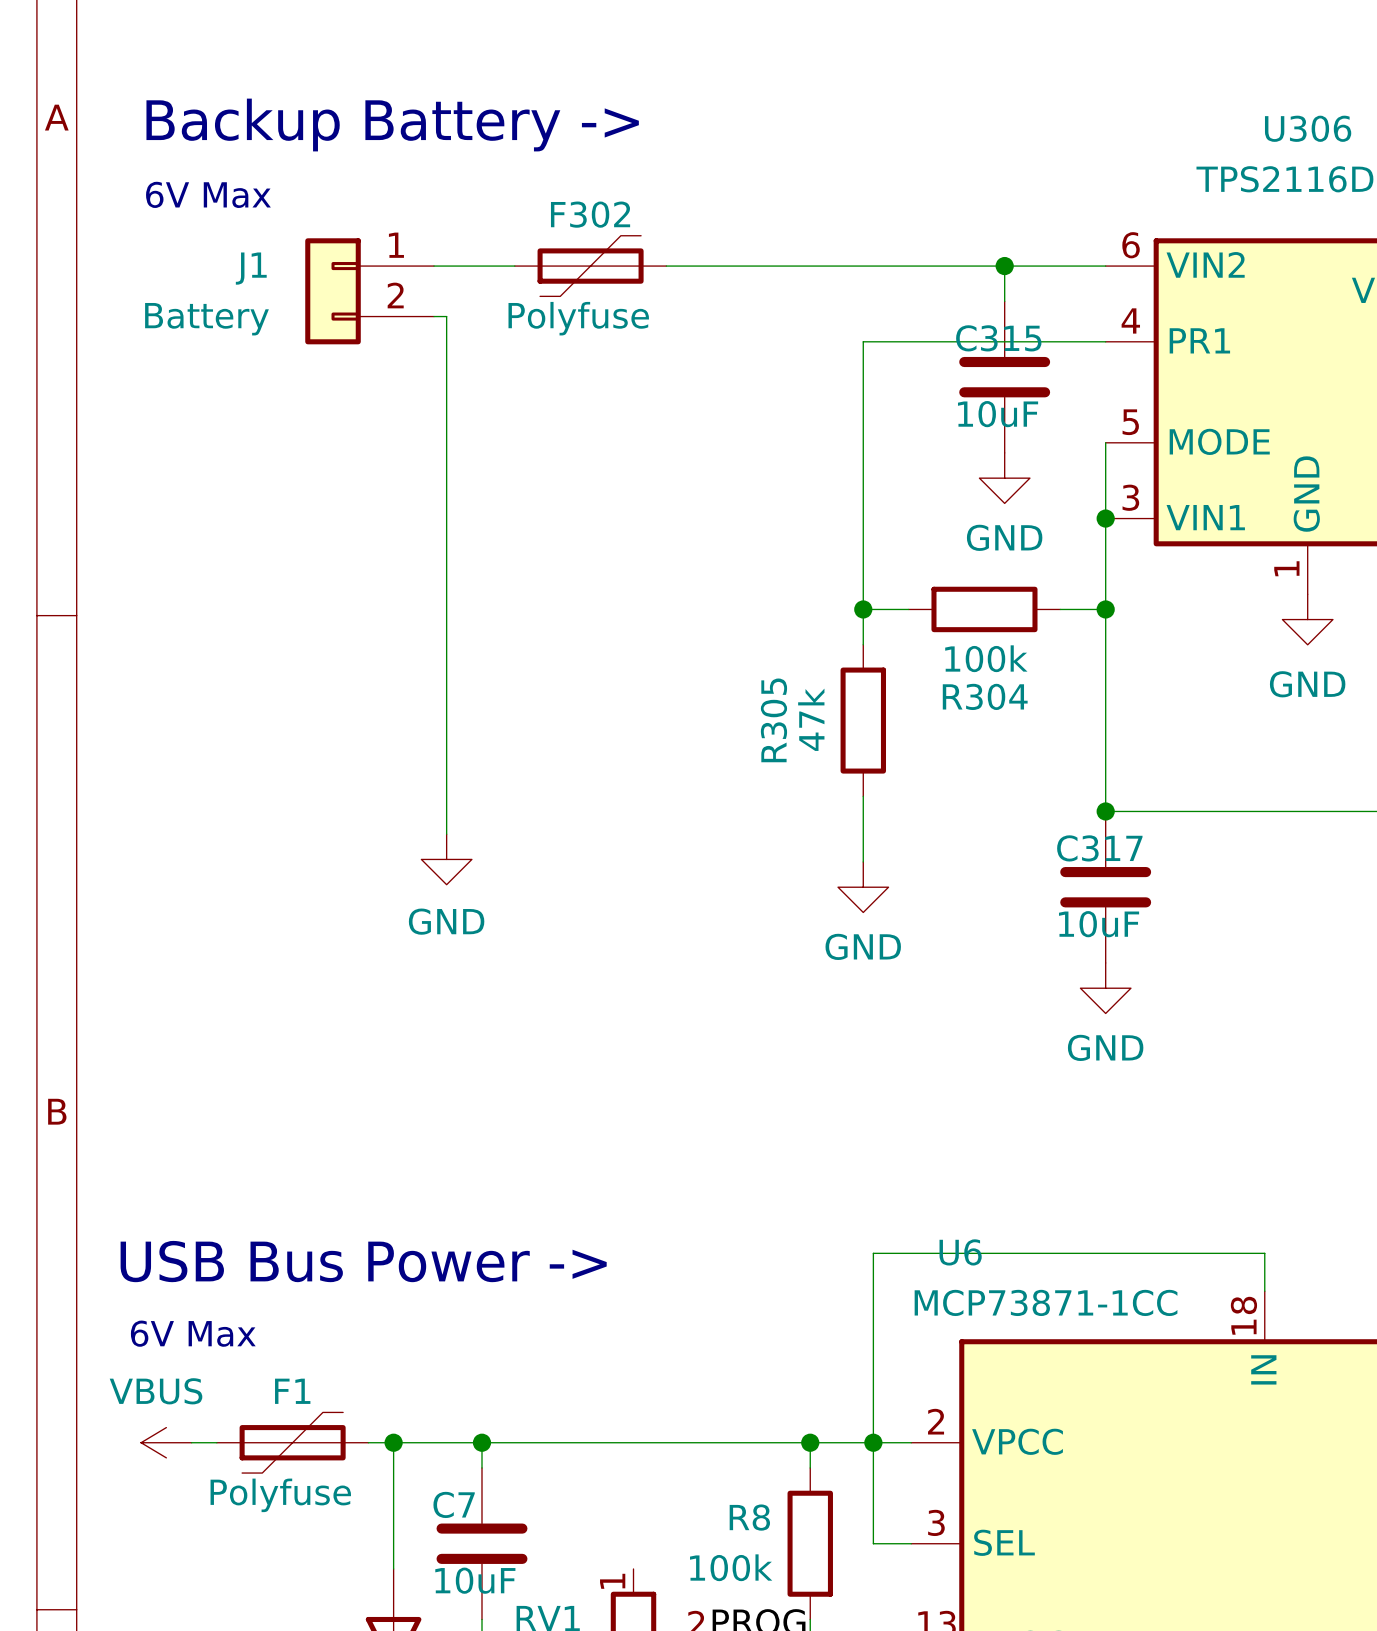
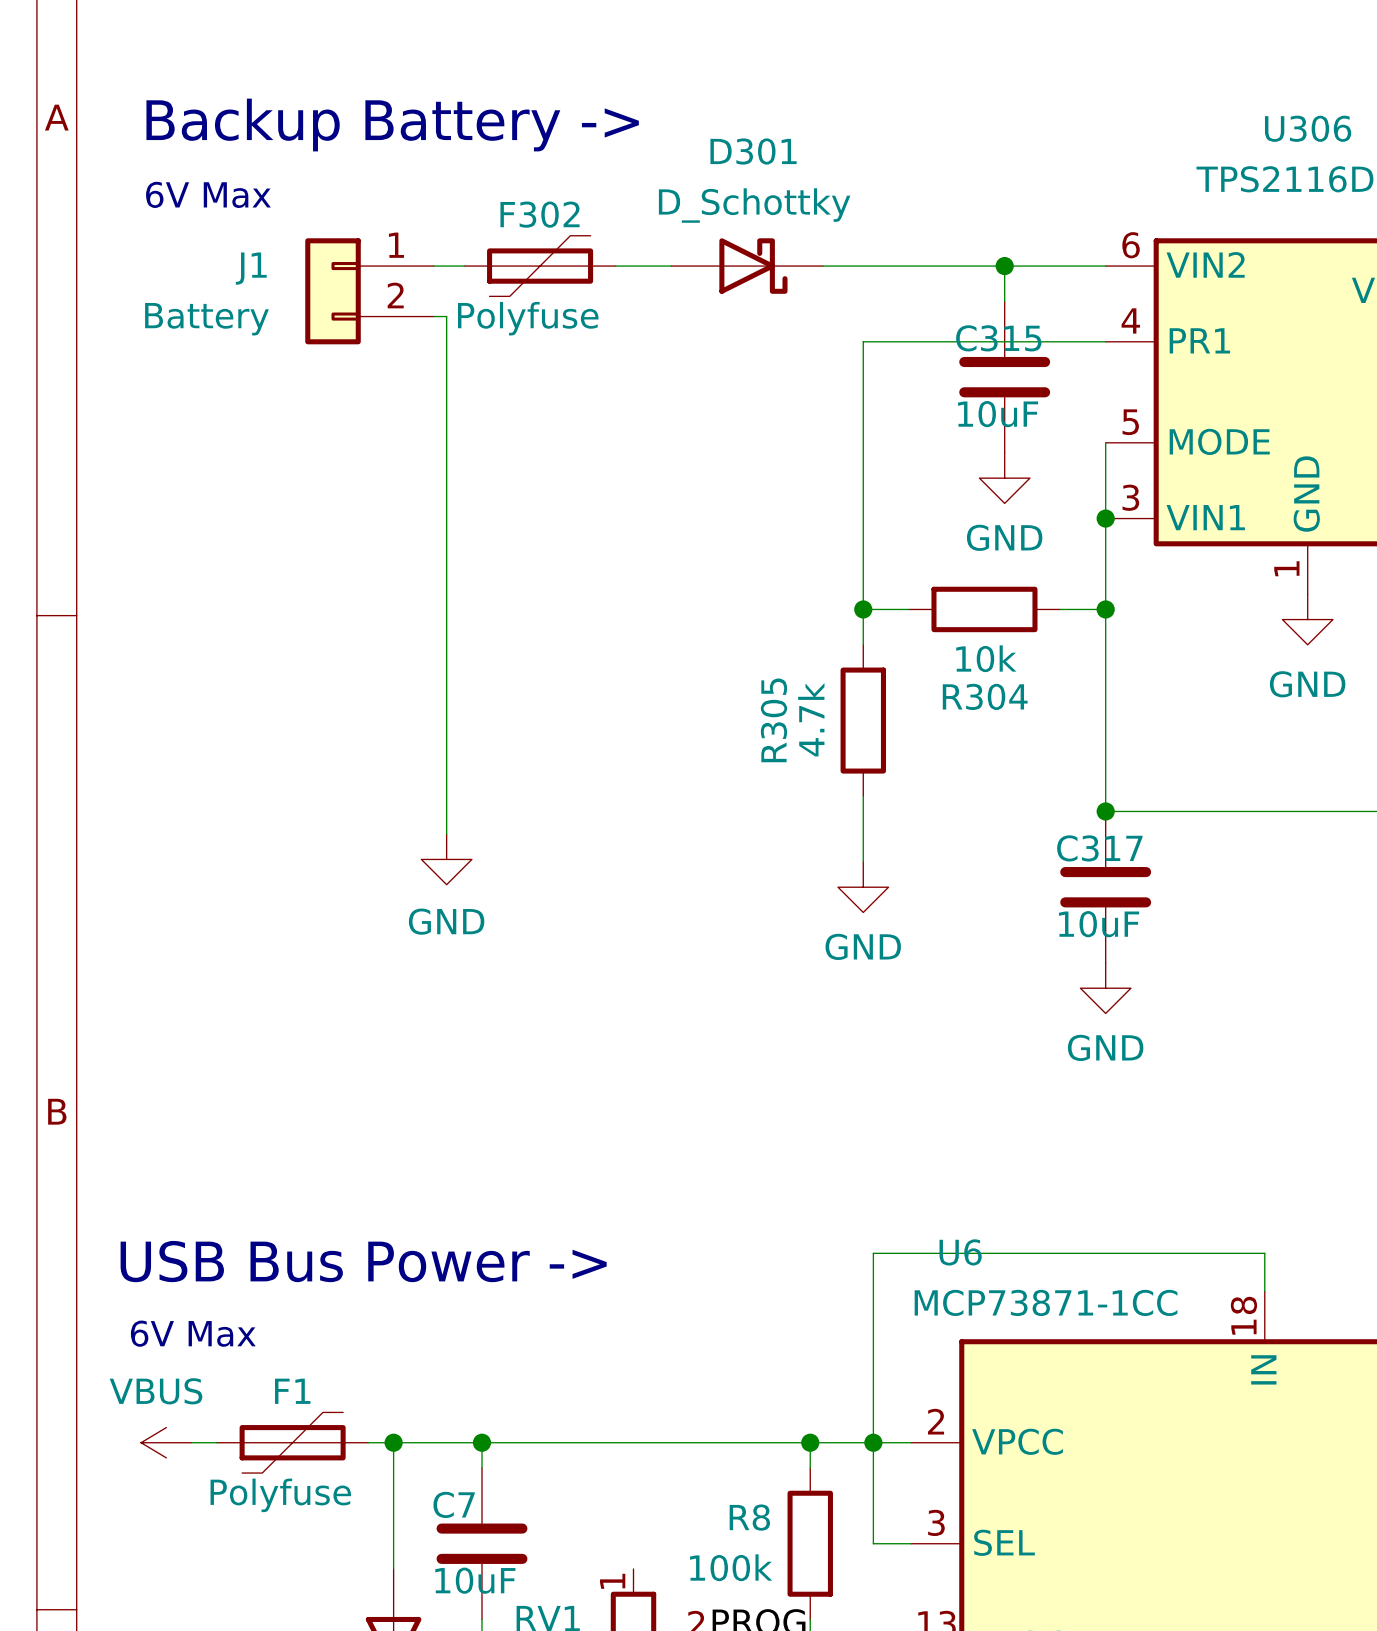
F302 position: (590, 266) -> (540, 266)
D301: none -> D_Schottky (747, 266)
R304 value: 100k (986, 658) -> 10k (986, 658)
R305 value: 47k (811, 719) -> 4.7k (811, 719)

